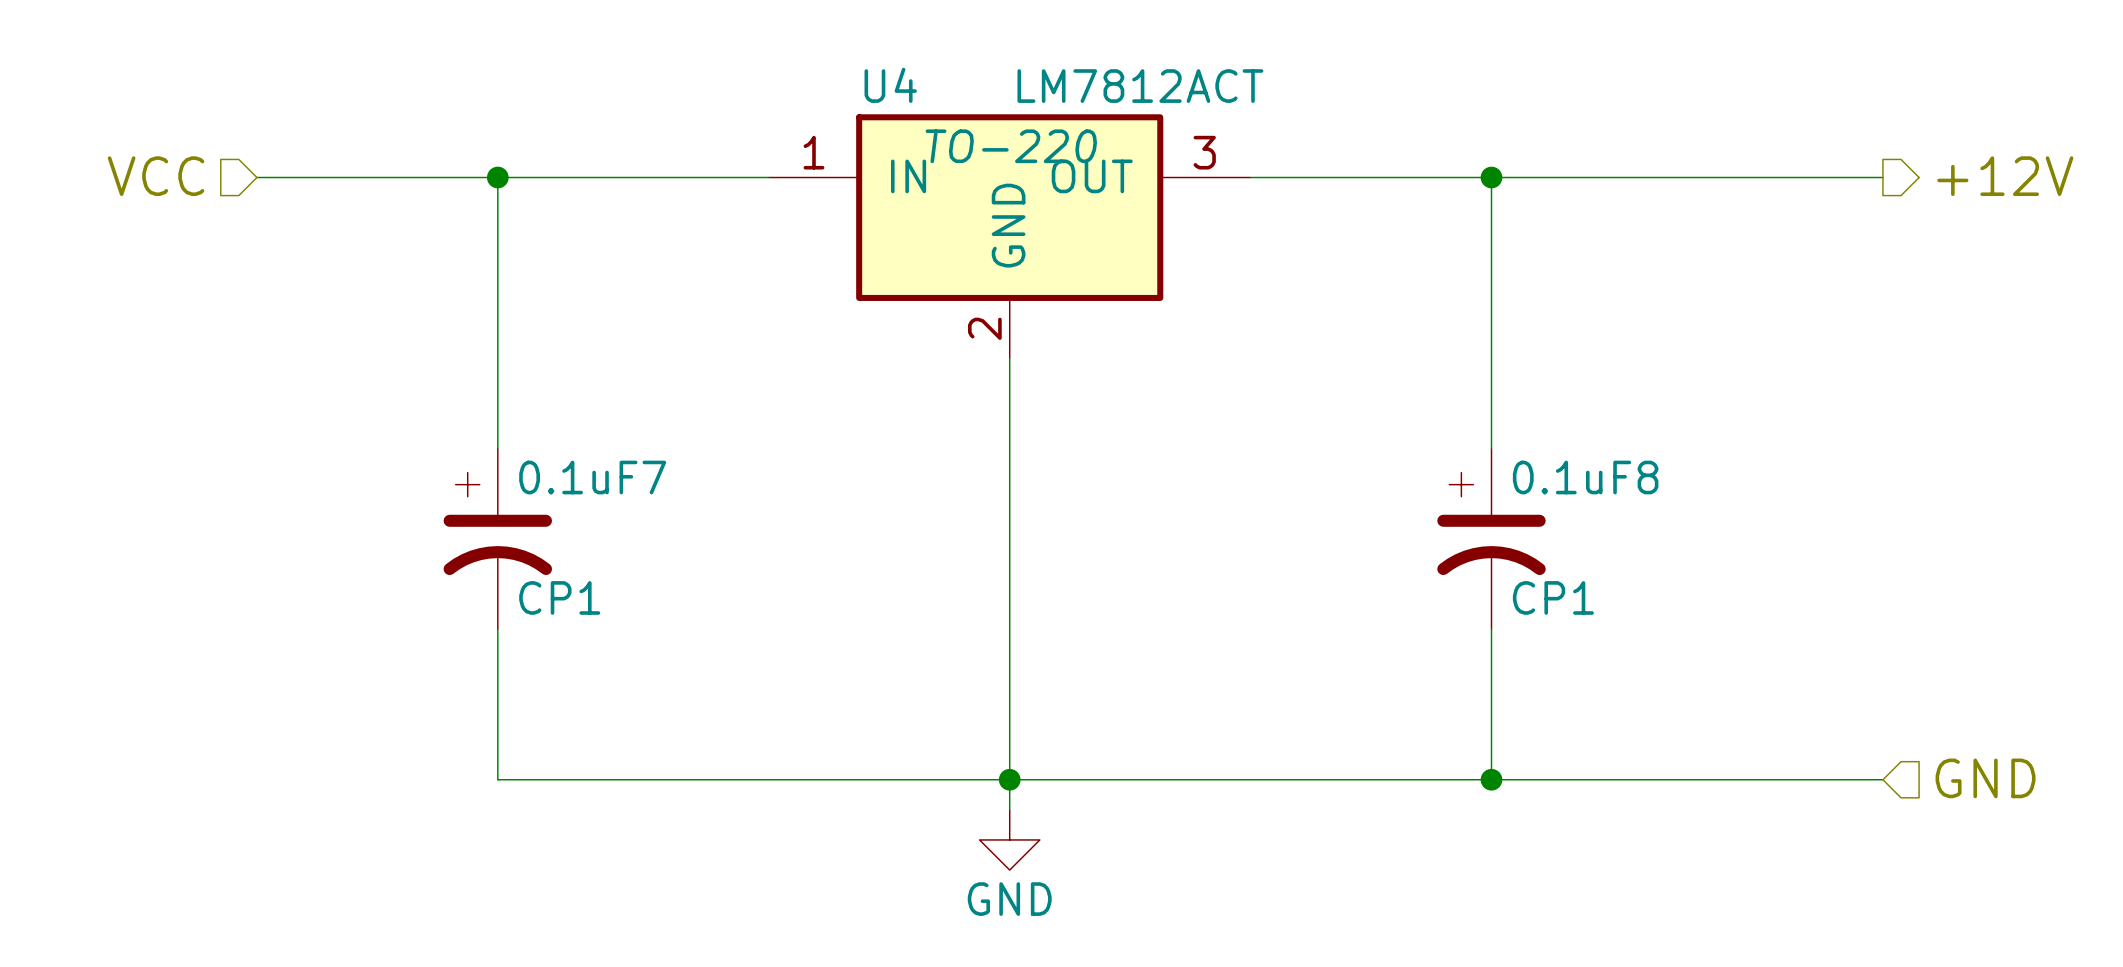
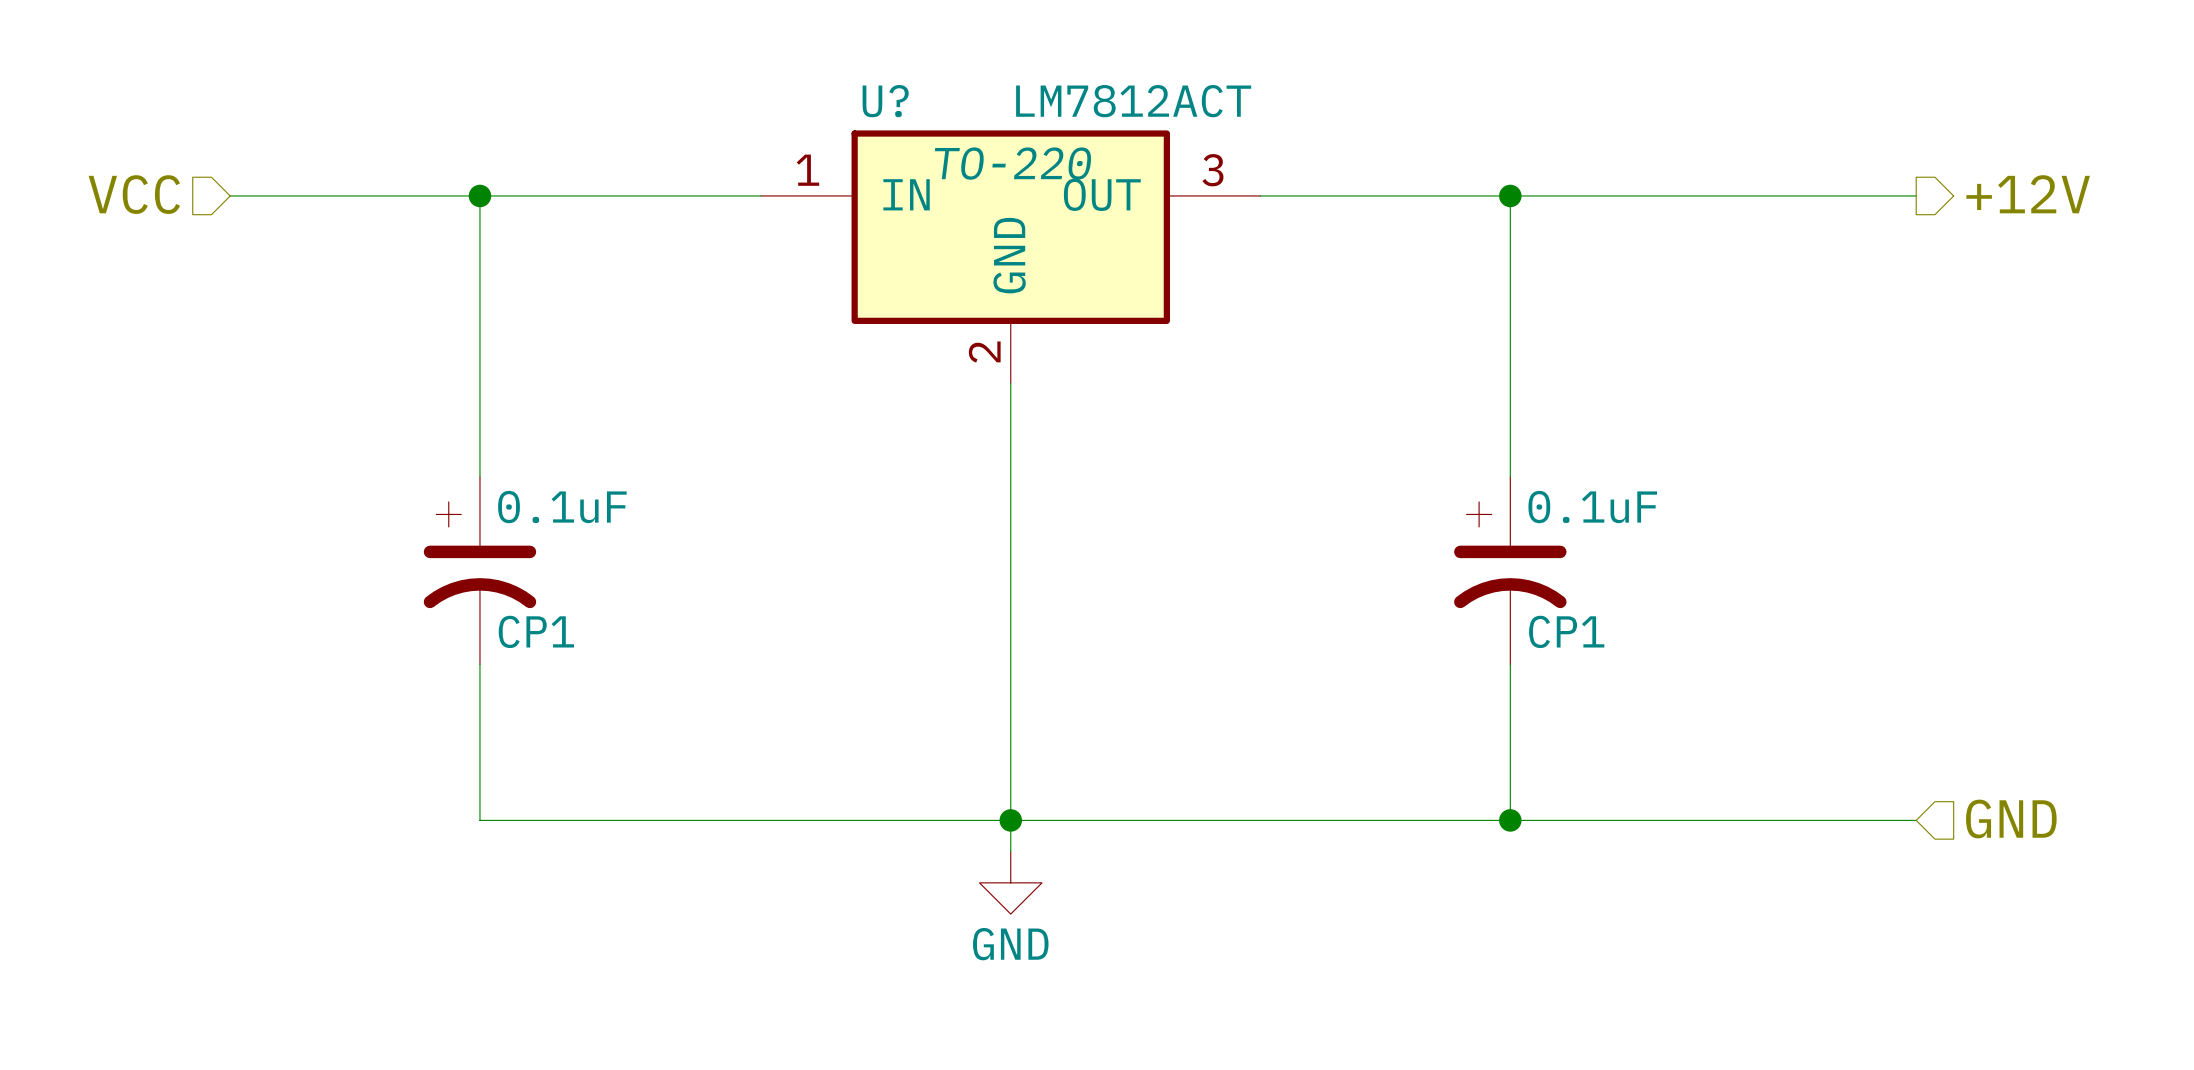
U4 name: U4 (890, 85) -> U? (885, 101)
0.1uF7 name: 0.1uF7 (592, 477) -> 0.1uF (562, 507)
0.1uF8 name: 0.1uF8 (1585, 477) -> 0.1uF (1592, 507)

